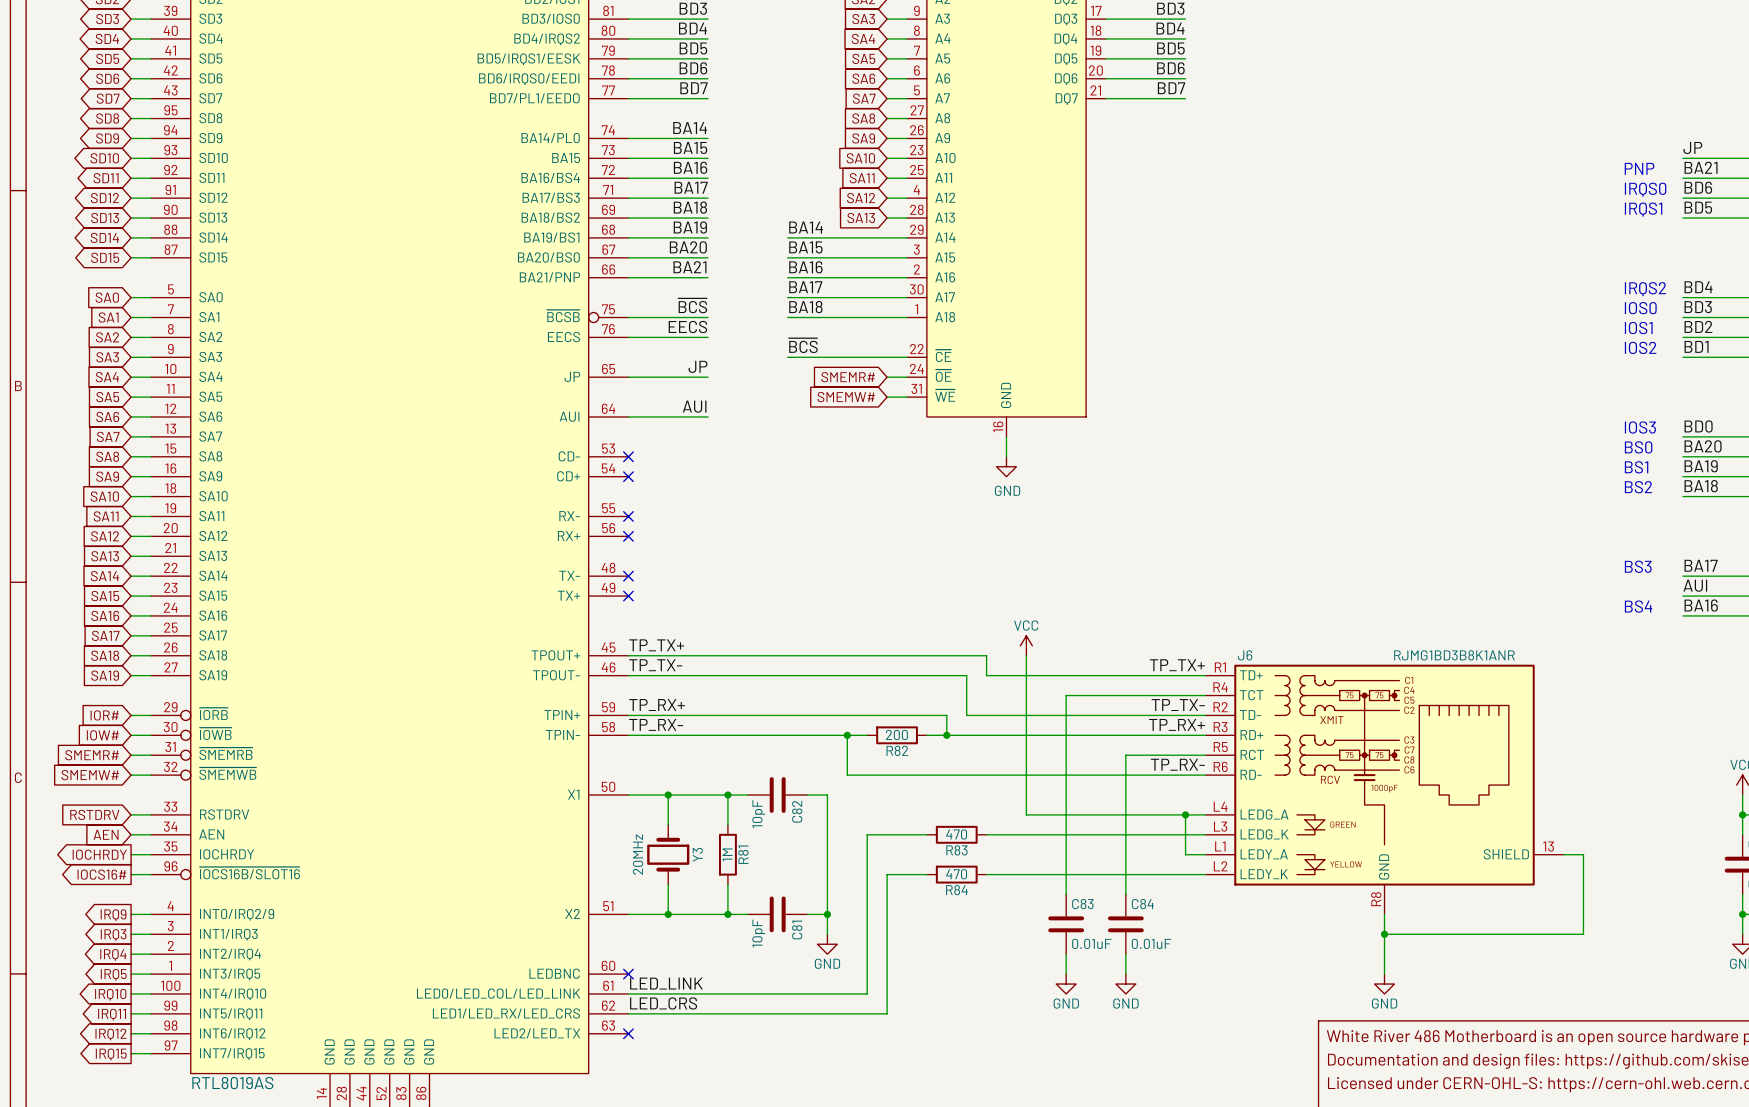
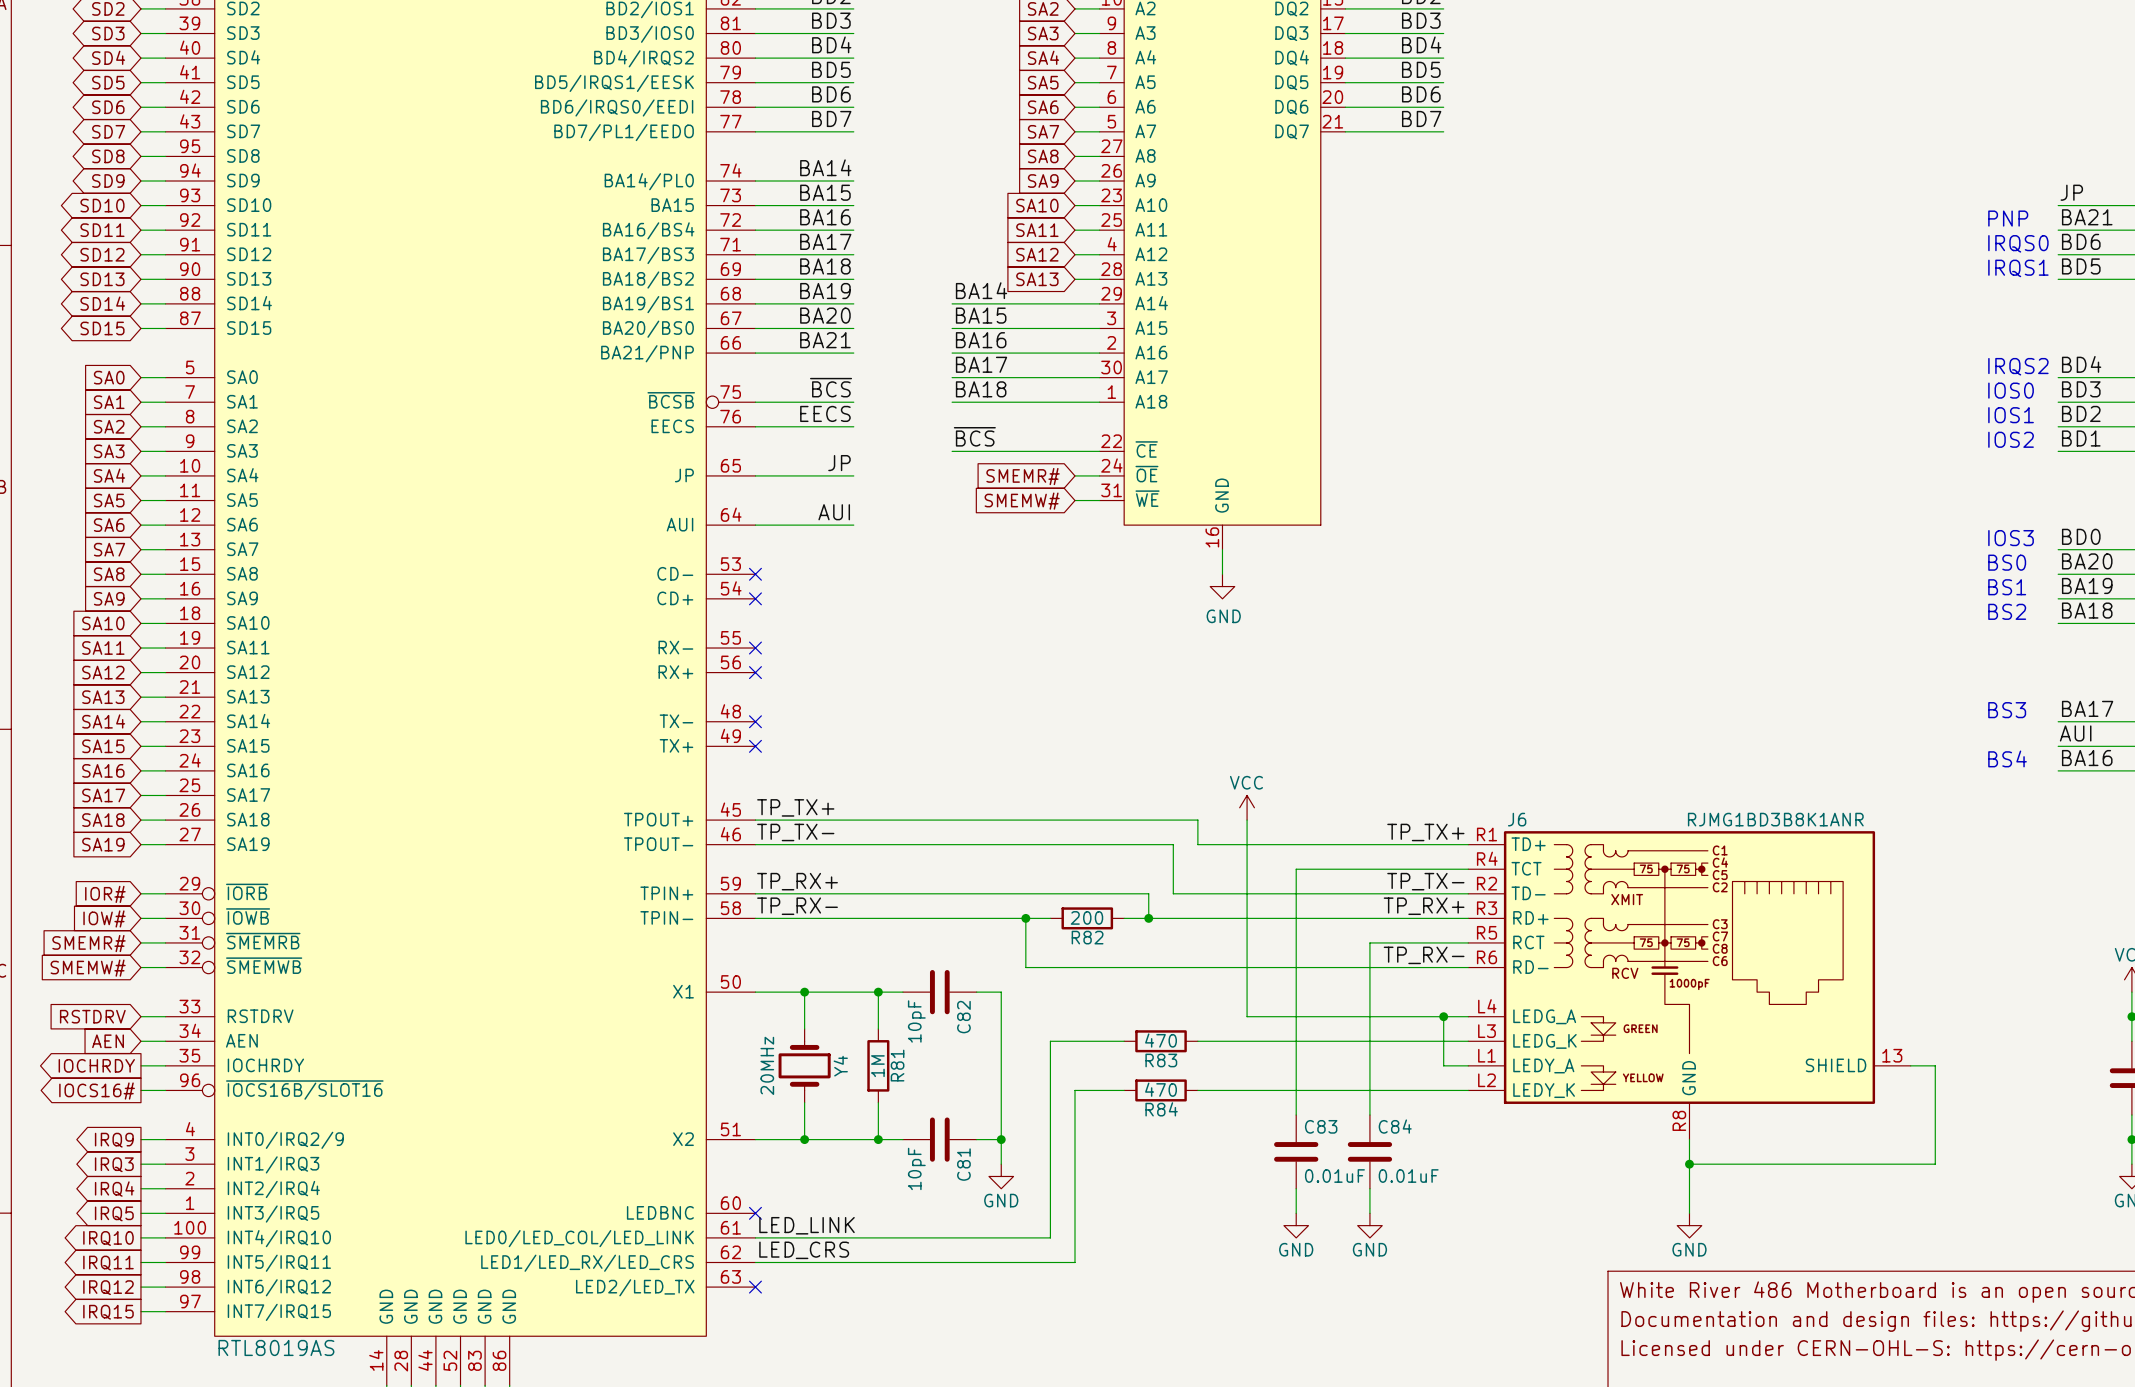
Y3 name: Y3 (697, 854) -> Y4 (840, 1066)

